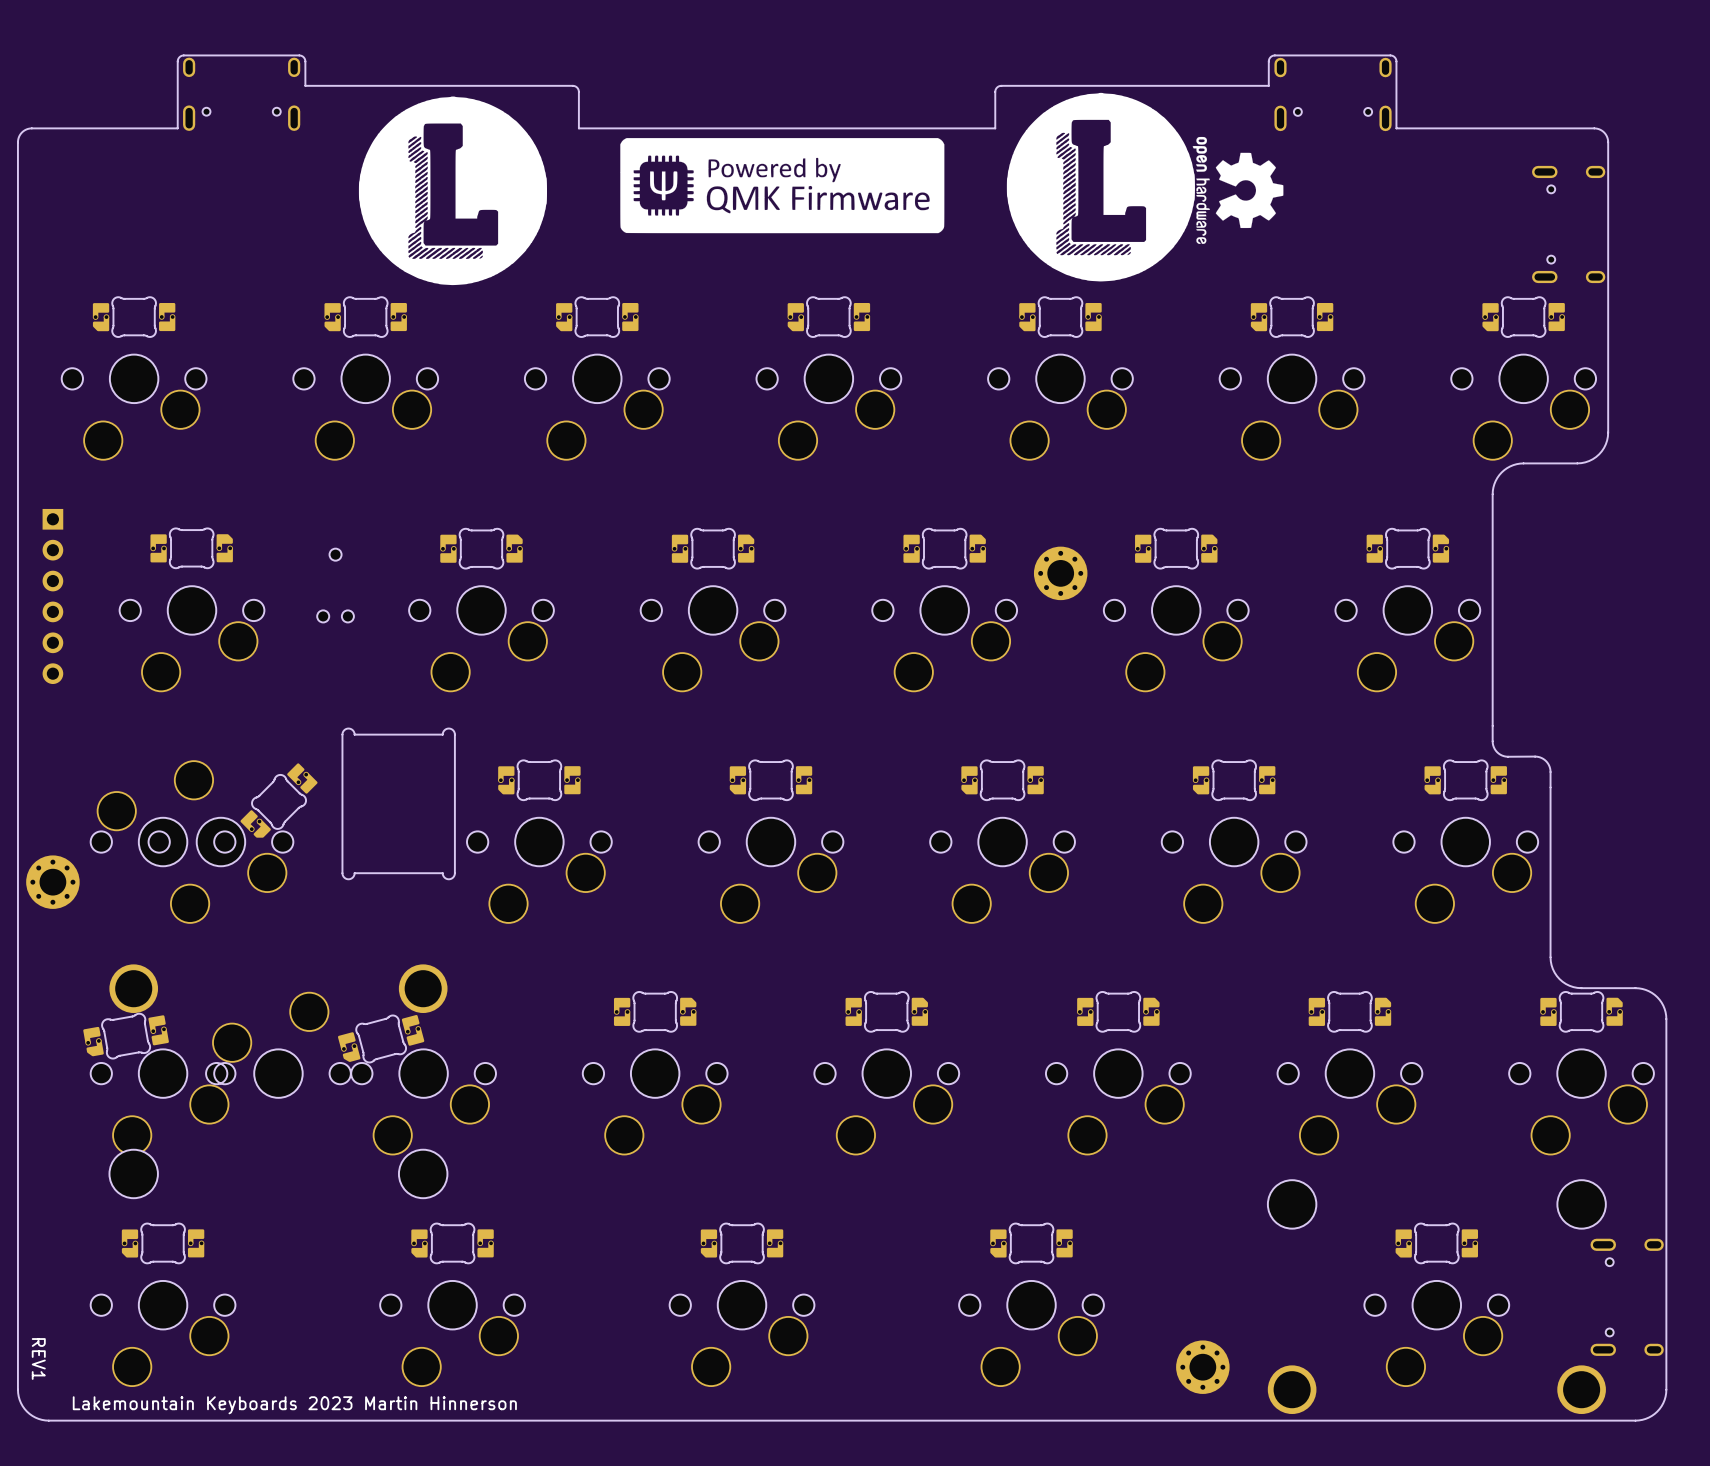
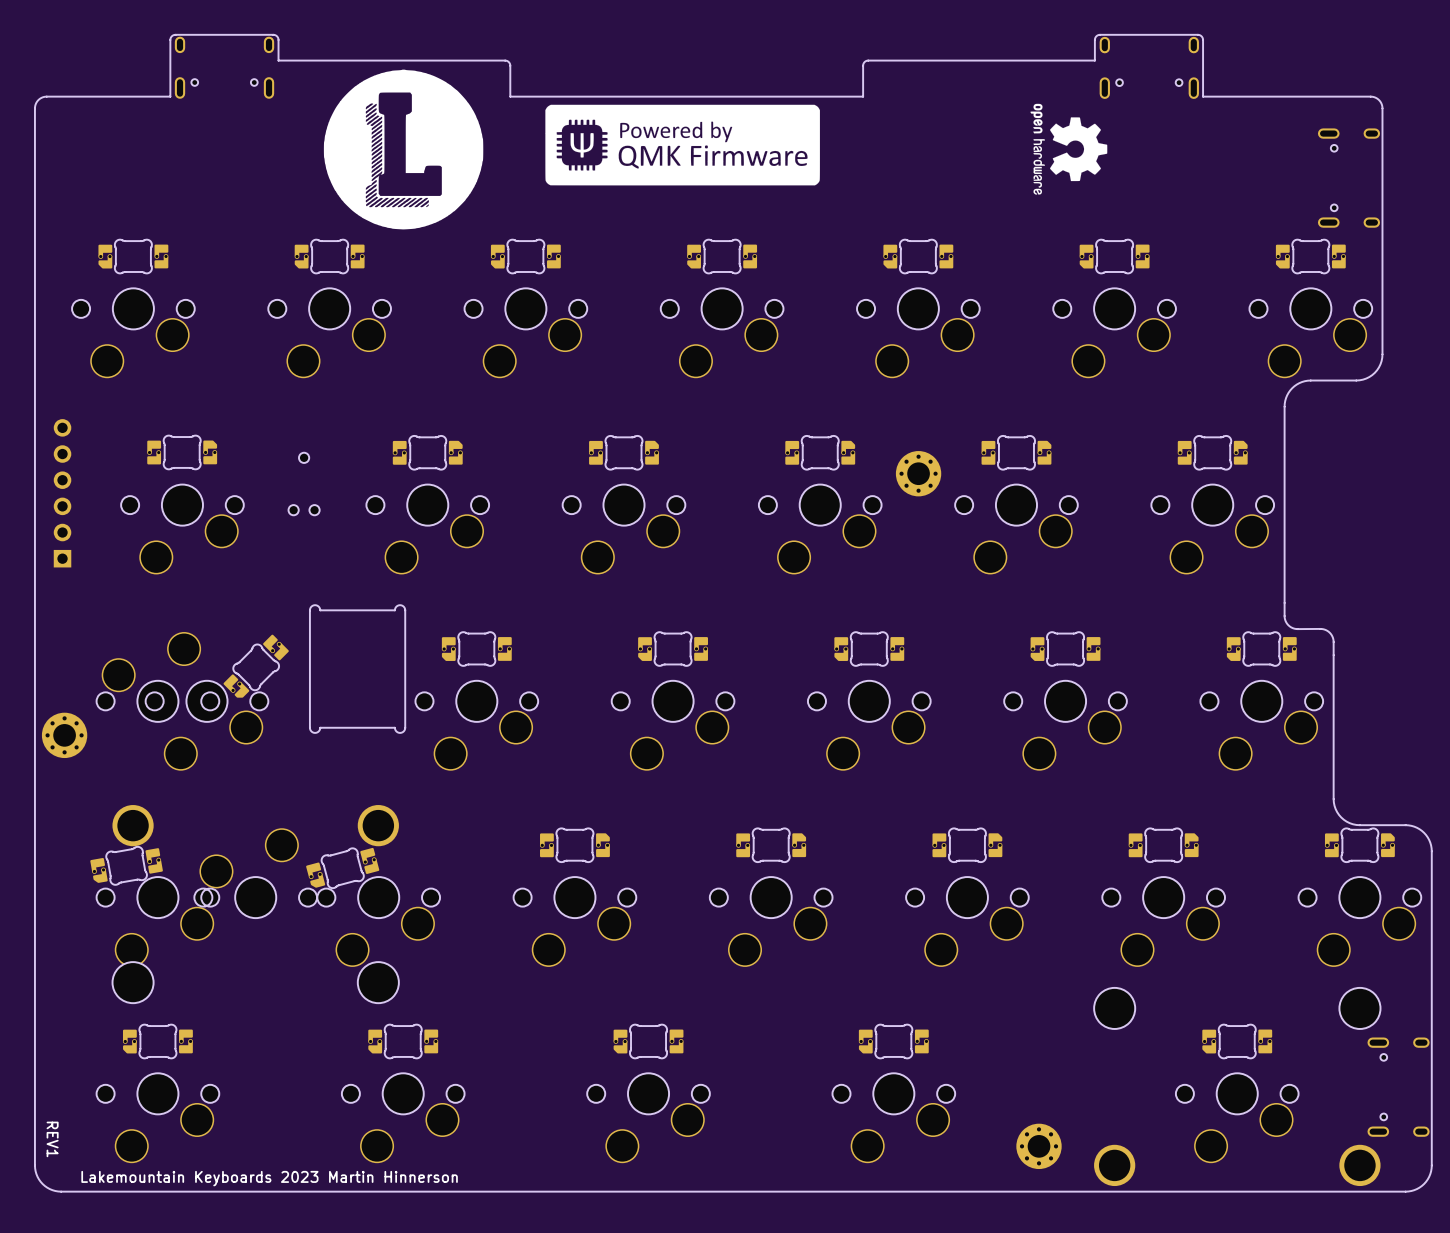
drawing: [1006, 92, 1195, 282] -> none
part rotation: 0° (52, 596) -> 180° (62, 493)

